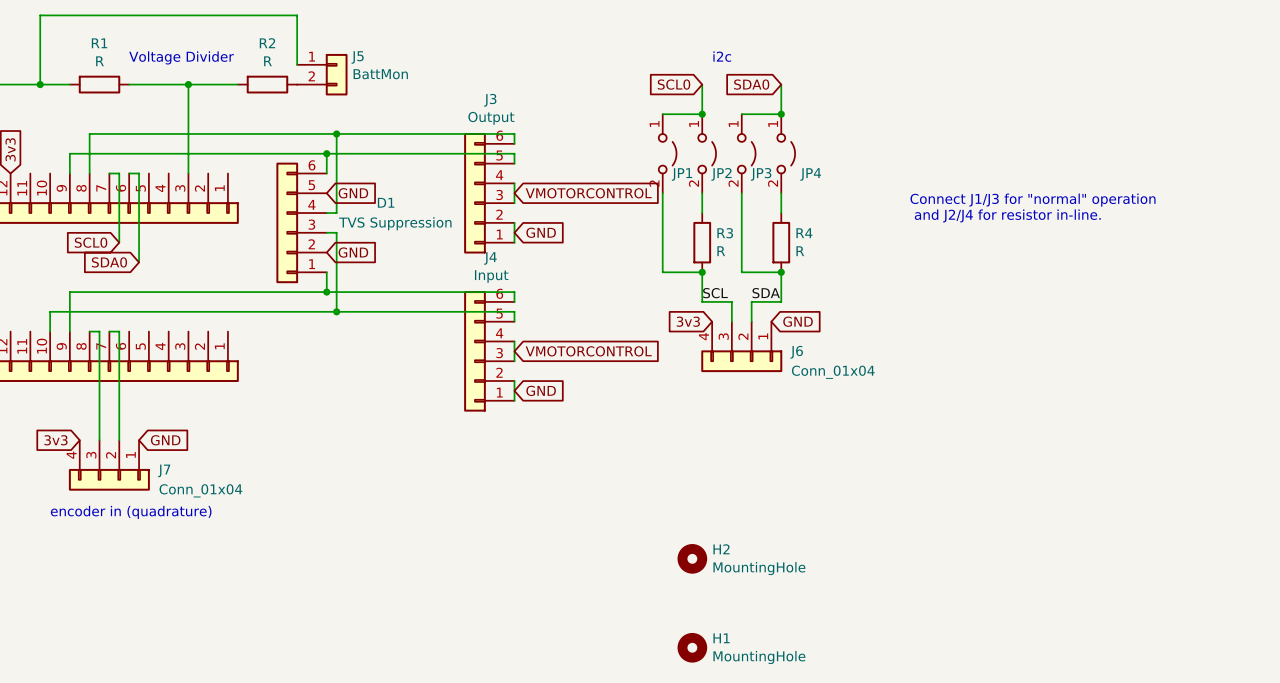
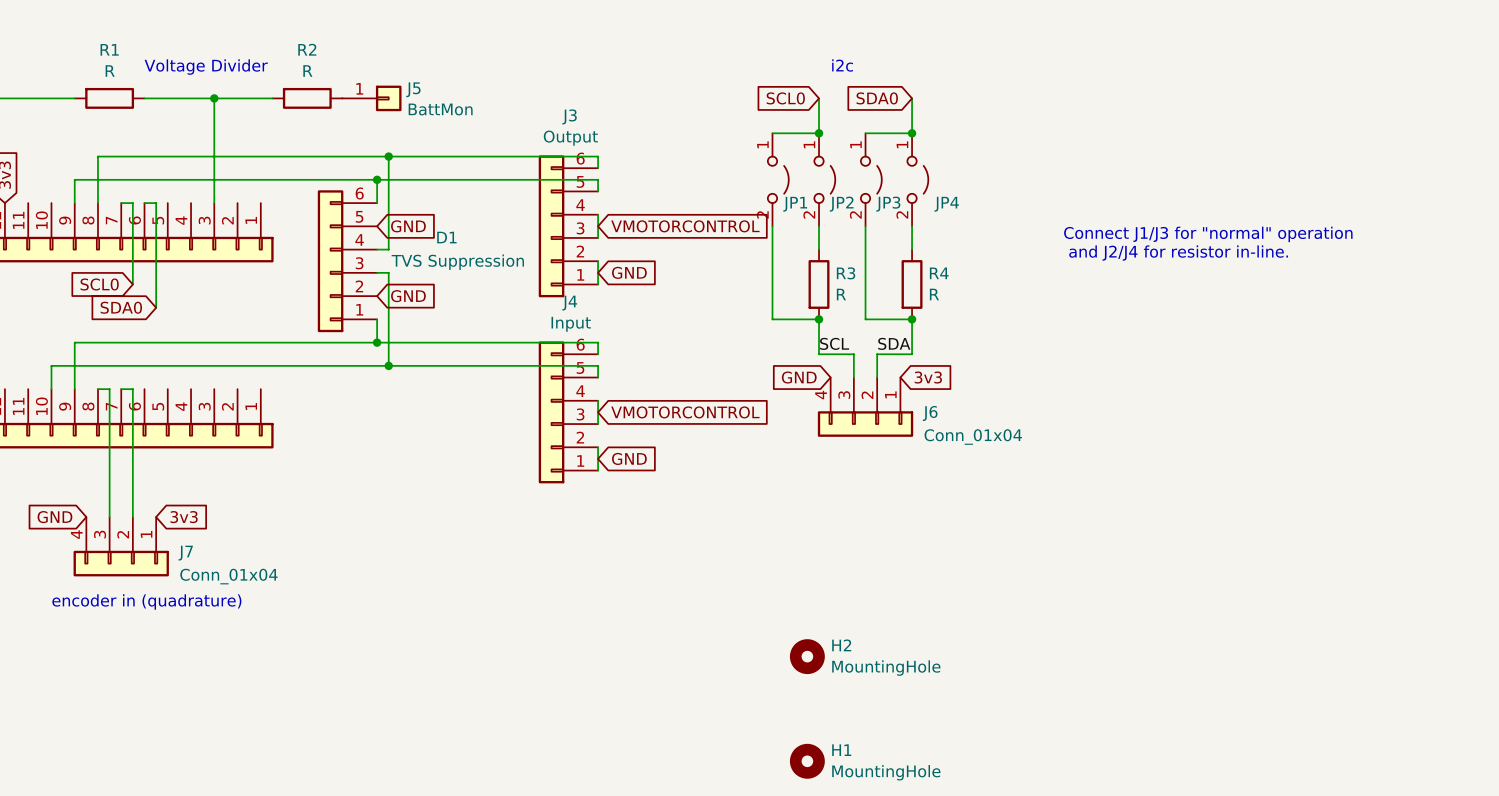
J5 symbol: [297, 53, 348, 96] -> [342, 85, 402, 112]
wire: (297, 64) (297, 15) (40, 15) (40, 84) -> none
junction: (40, 84) -> none
global label: 3v3 (688, 321) -> GND (799, 377)
global label: GND (798, 321) -> 3v3 (928, 377)
global label: 3v3 (55, 440) -> GND (54, 517)
global label: GND (165, 440) -> 3v3 (184, 517)

